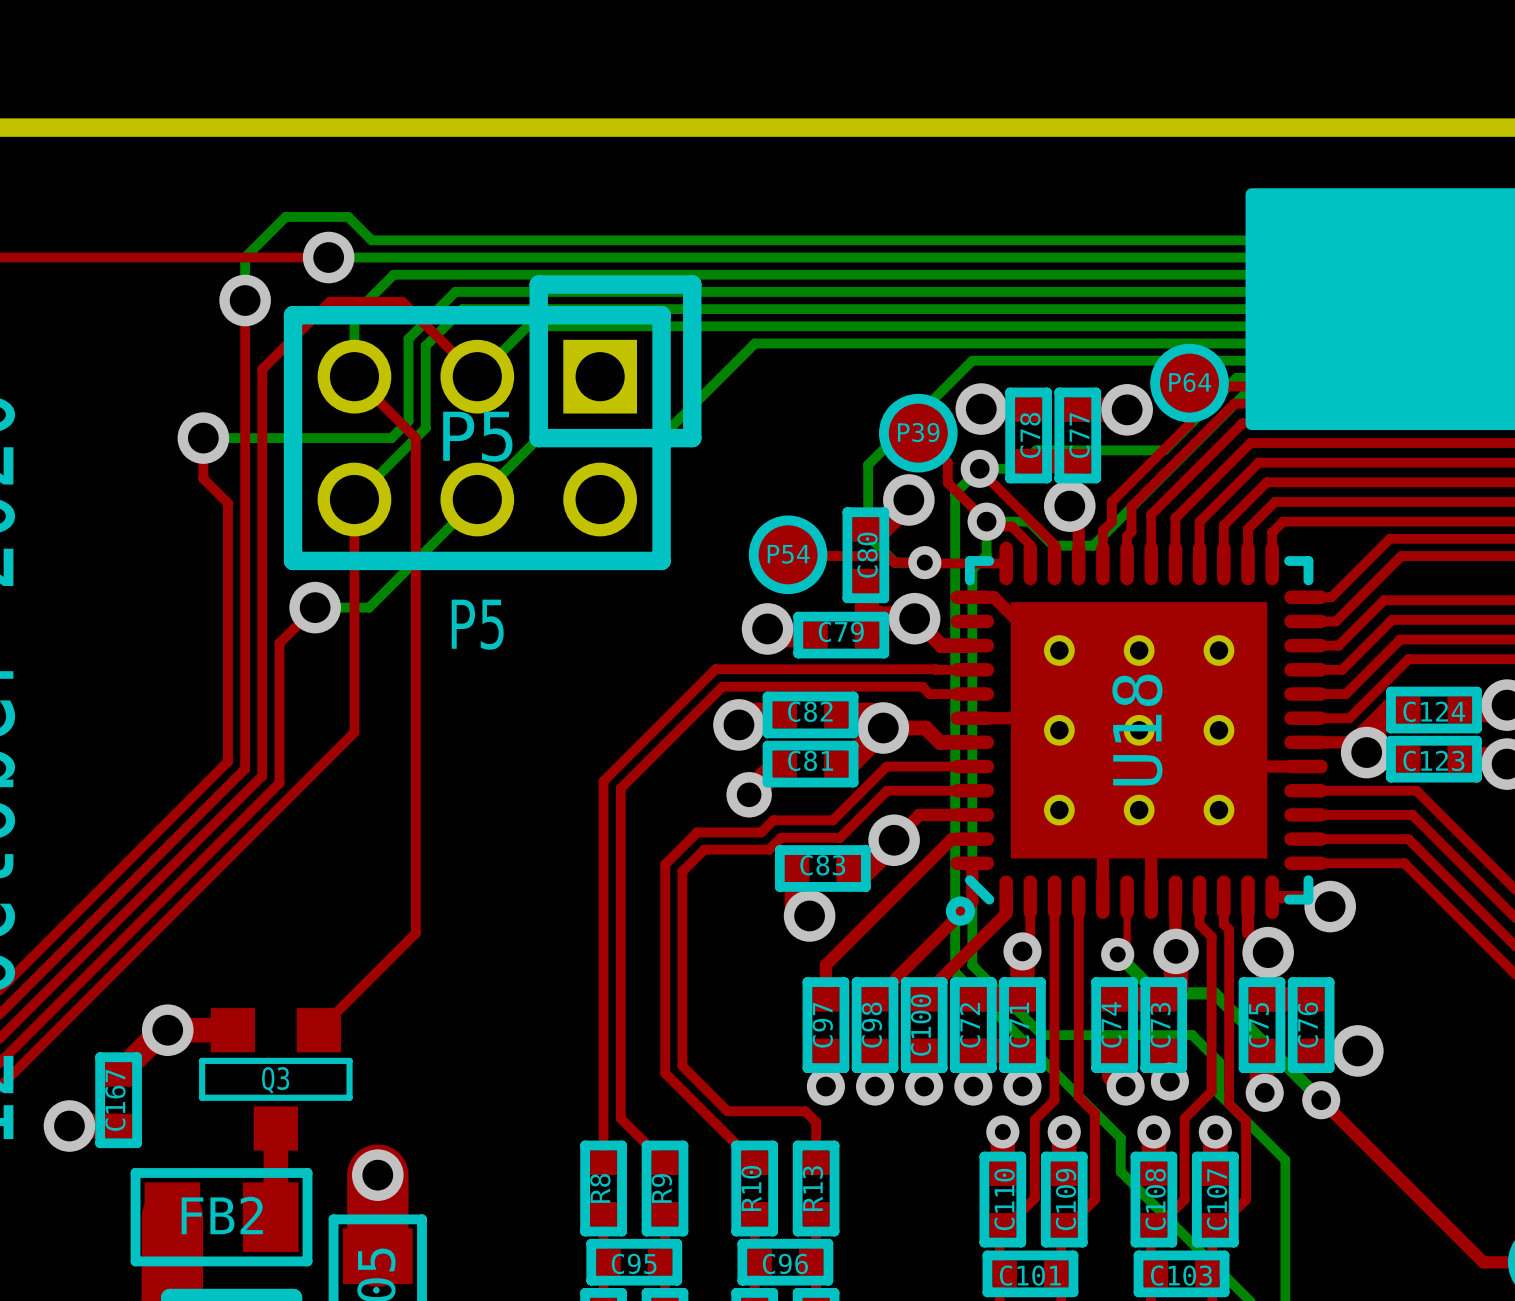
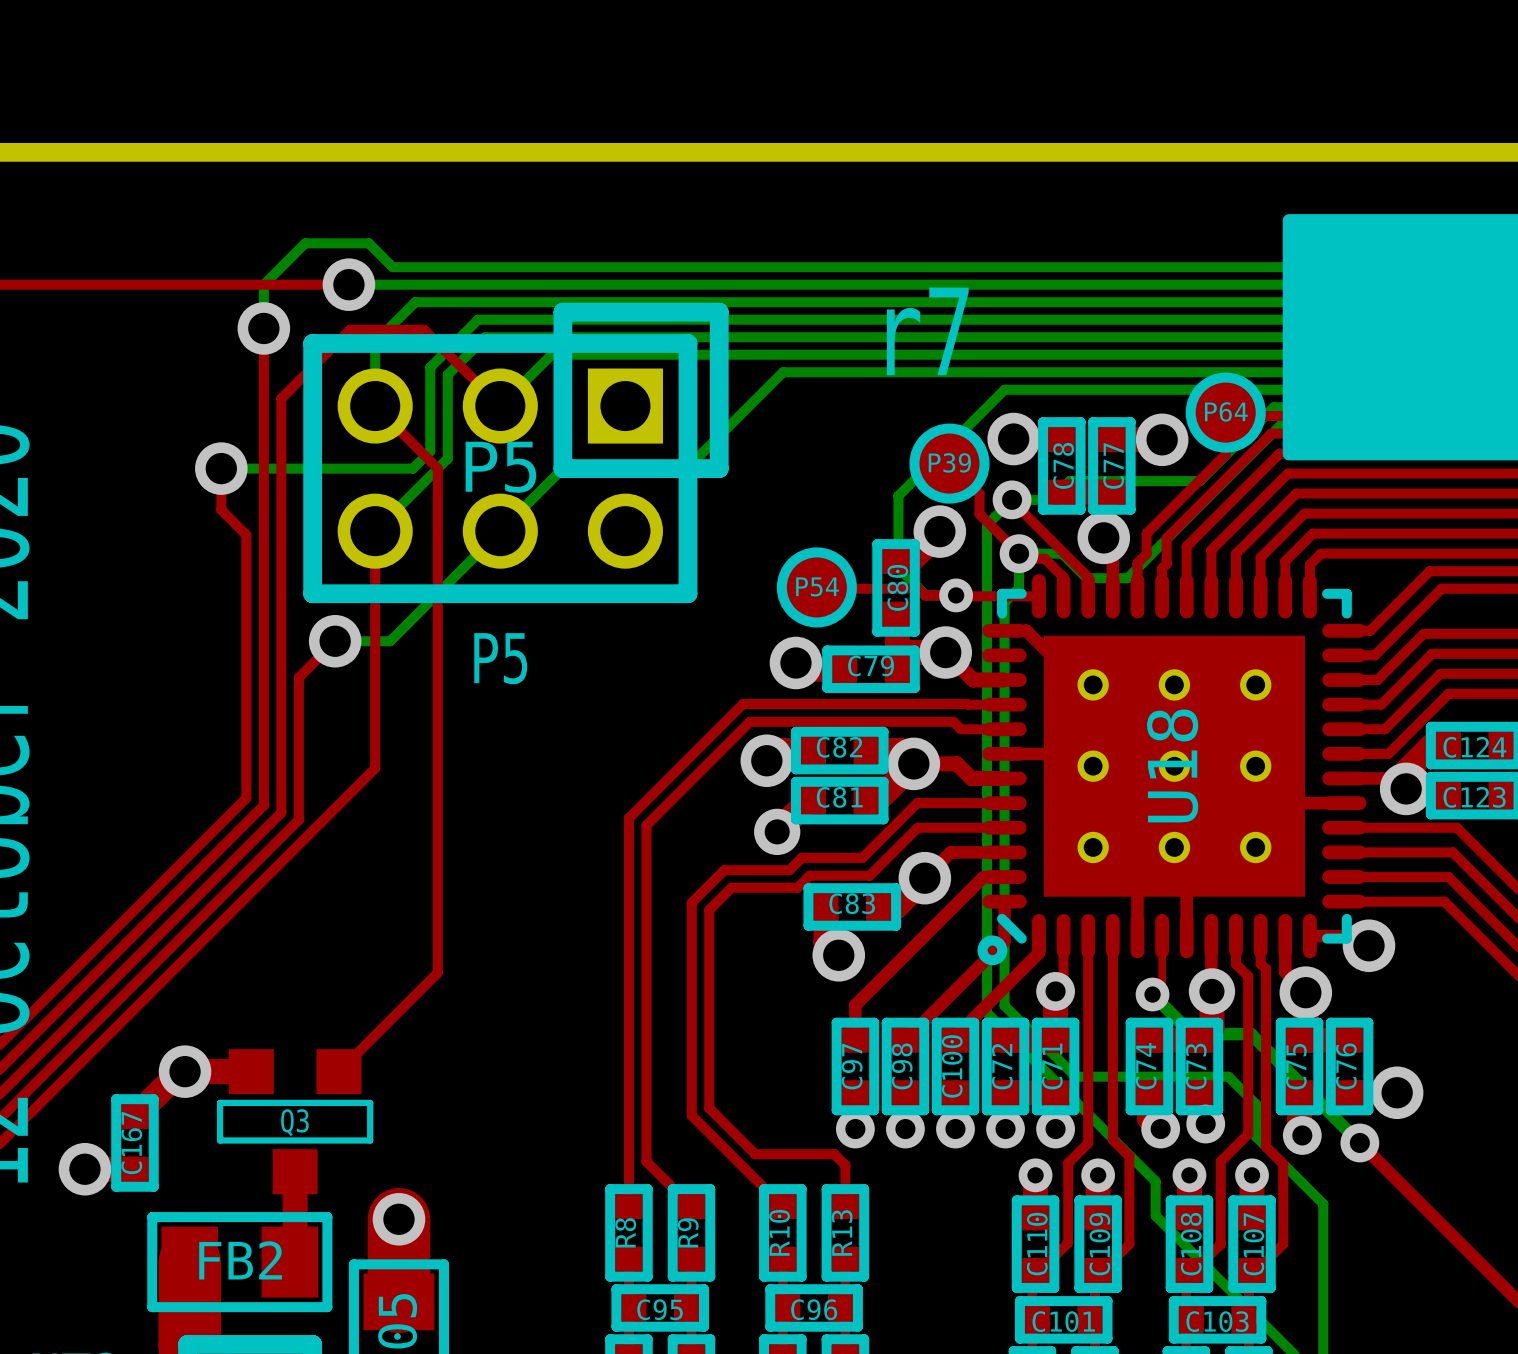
text: none -> r7 (927, 331)

